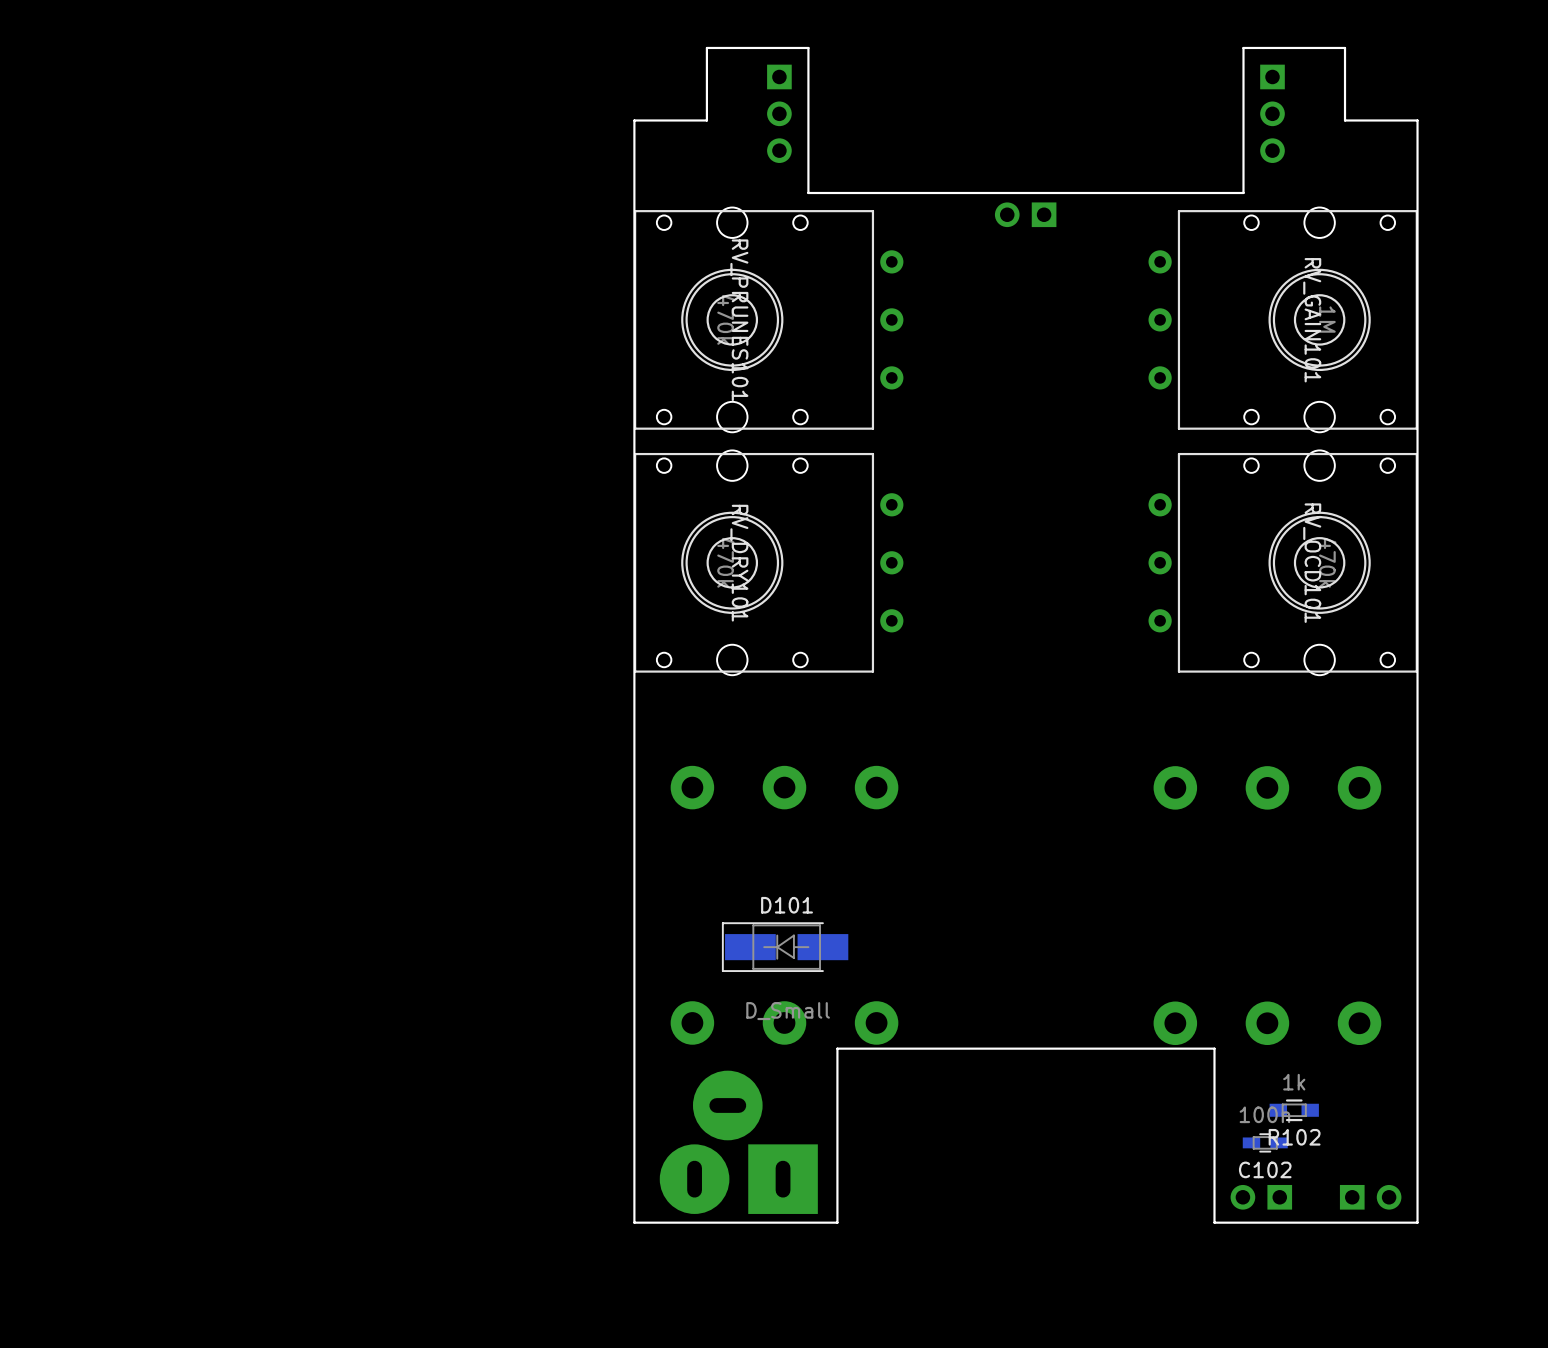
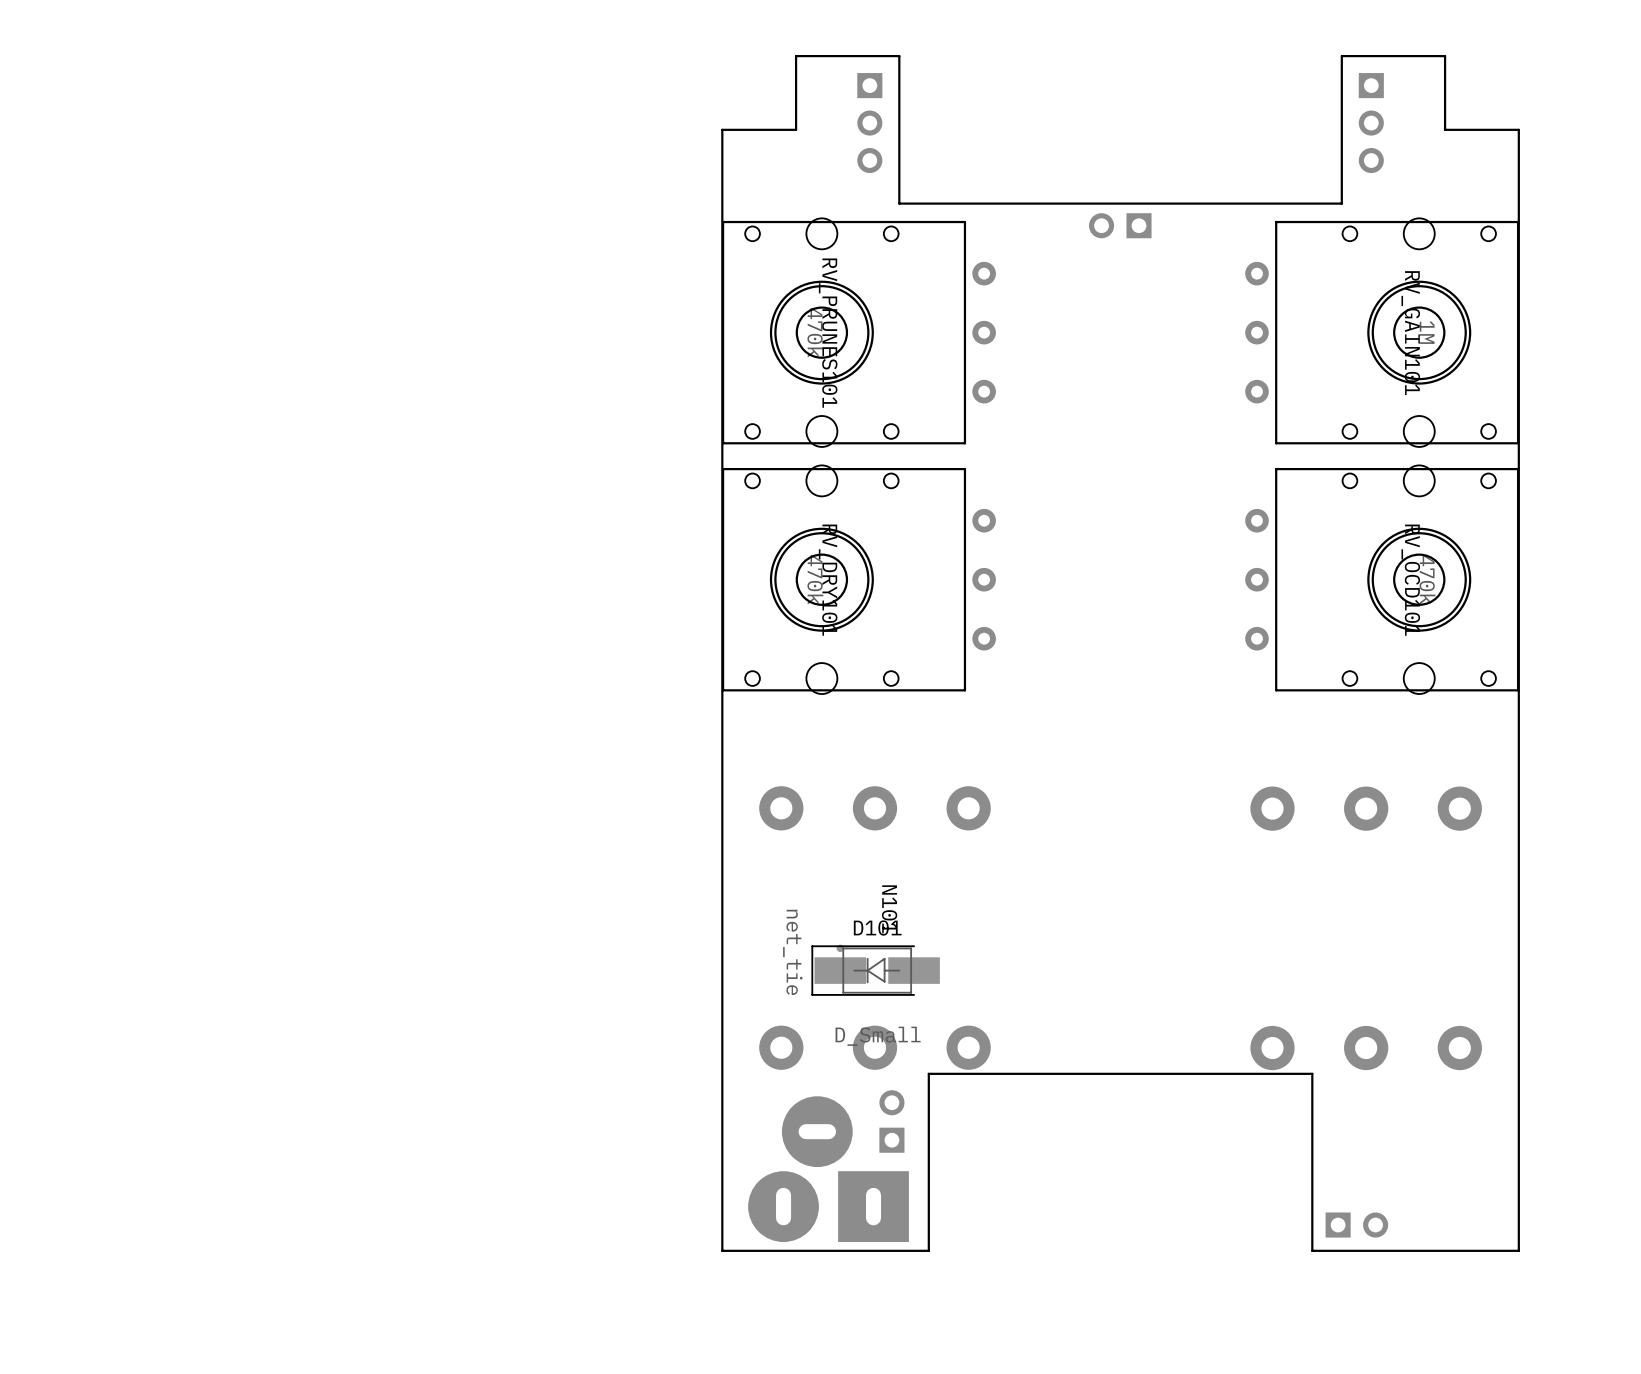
N101: none -> net_tie (840, 955)
part: none -> (891, 1121)
R102: 1k (1294, 1110) -> none
C102: 100n (1265, 1142) -> none
part rotation: 0° (1261, 1197) -> 180° (1356, 1225)
part: (1370, 1197) -> none

